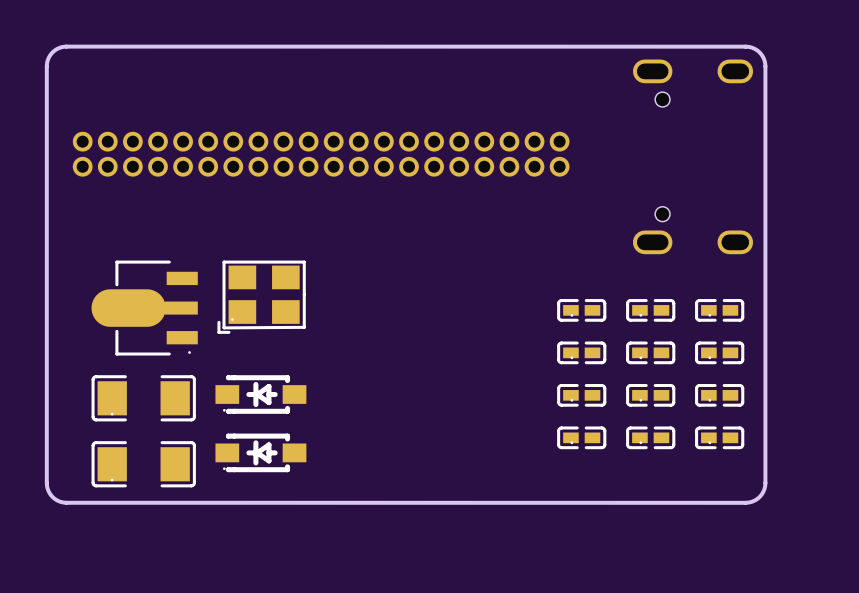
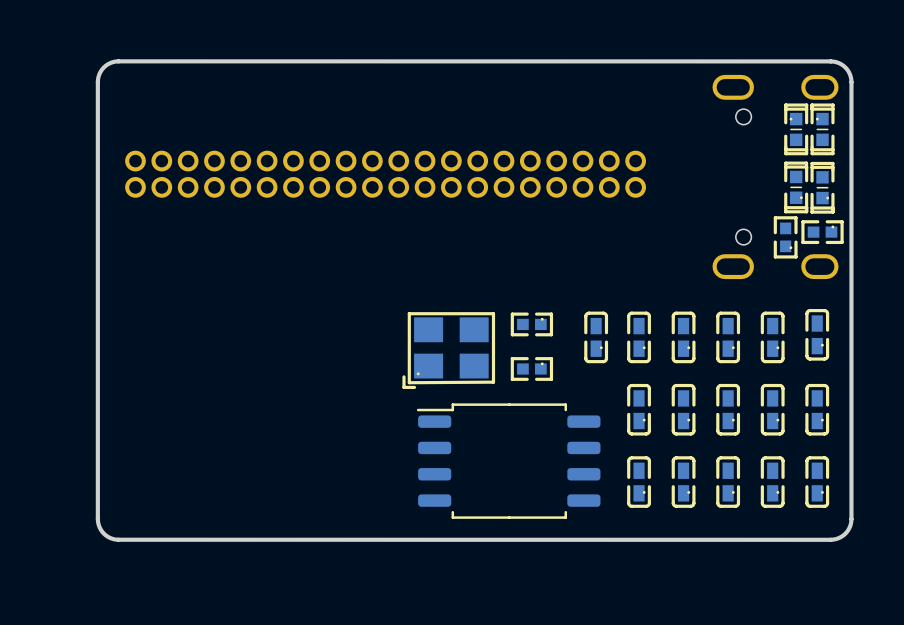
part: none -> (796, 129)
part: none -> (822, 129)
part: none -> (796, 187)
part: none -> (822, 187)
part: none -> (822, 232)
part: none -> (785, 237)
part position: (261, 297) -> (448, 350)
part: none -> (531, 324)
part: (144, 308) -> none
part: none -> (596, 337)
part: none -> (639, 337)
part: none -> (683, 337)
part: none -> (772, 337)
part: (581, 310) -> none
part rotation: 0° (650, 310) -> 90° counterclockwise (728, 337)
part rotation: 0° (719, 310) -> 90° counterclockwise (817, 334)
part: none -> (531, 368)
part: (581, 352) -> none
part: (650, 352) -> none
part: (719, 352) -> none
part: none -> (639, 409)
part: none -> (683, 409)
part: none -> (728, 409)
part: none -> (772, 409)
part: none -> (817, 409)
part: (260, 394) -> none
part: (581, 395) -> none
part: (650, 395) -> none
part: (719, 395) -> none
part: (143, 398) -> none
part: none -> (508, 461)
part: (581, 437) -> none
part rotation: 0° (650, 437) -> 90° counterclockwise (728, 482)
part: (719, 437) -> none
part: none -> (639, 482)
part: none -> (683, 482)
part: none -> (772, 482)
part: none -> (817, 482)
part: (260, 452) -> none
part: (143, 464) -> none

